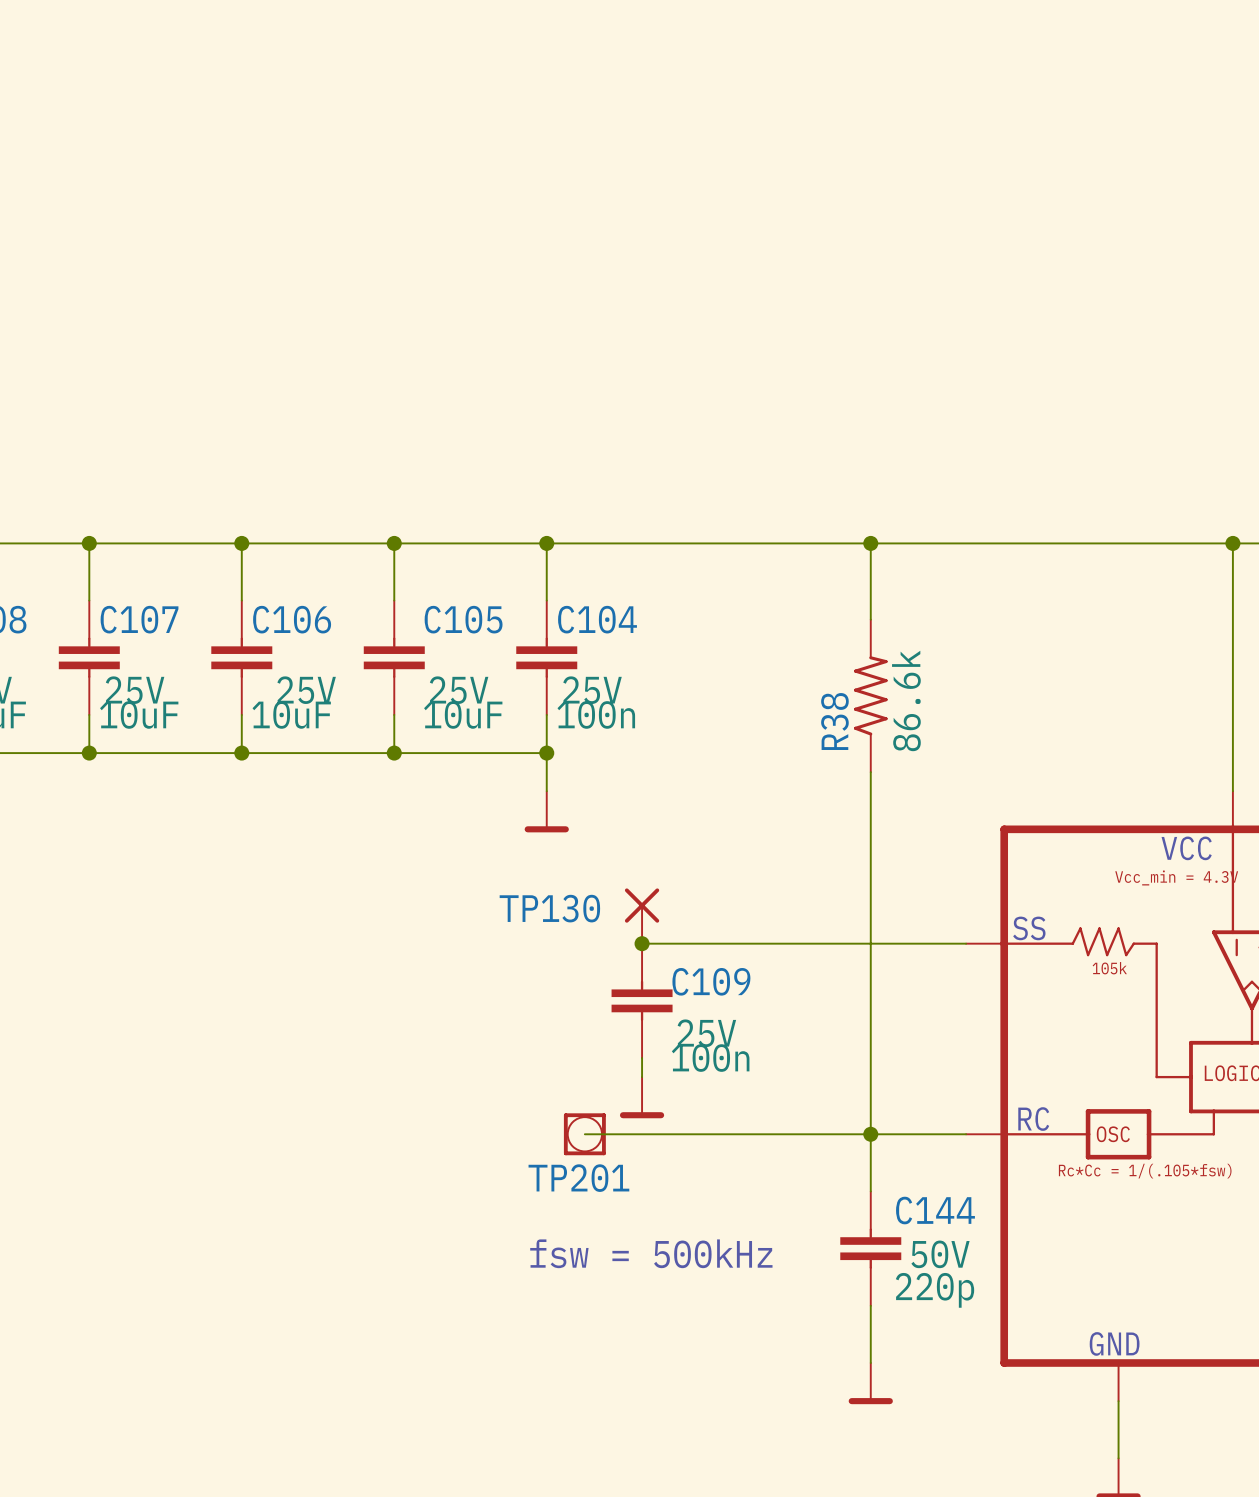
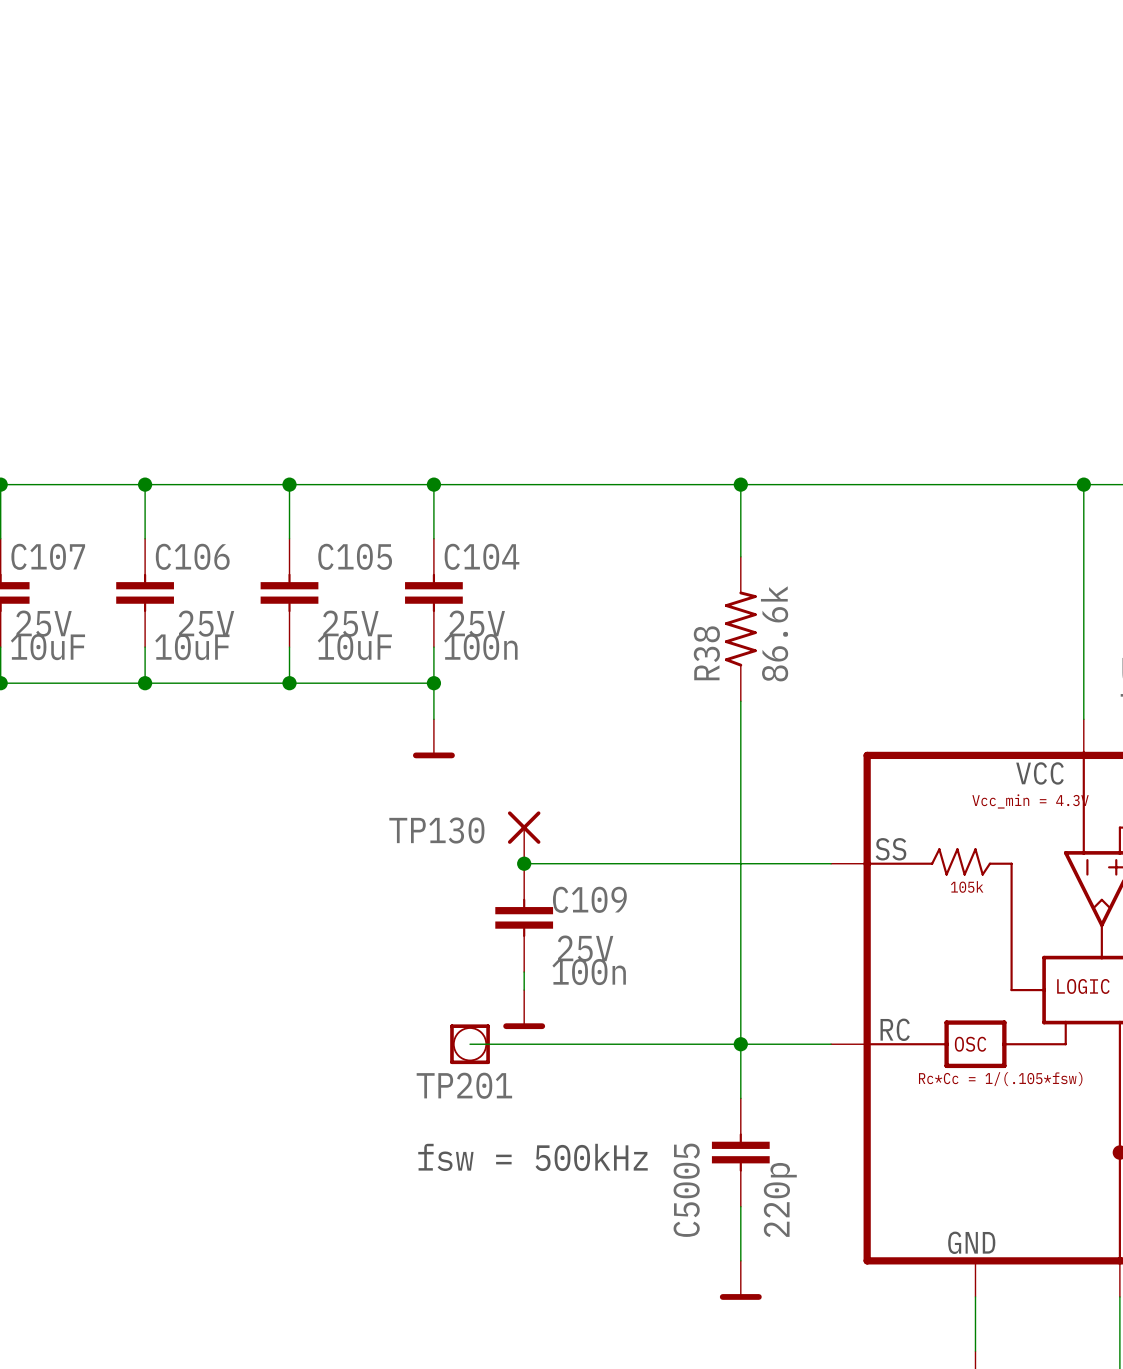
C144 name: C144 (935, 1210) -> C5005 (686, 1190)
C144 text: 50V (940, 1254) -> none
C144 value rotation: 0° (935, 1290) -> 90° counterclockwise (780, 1200)

